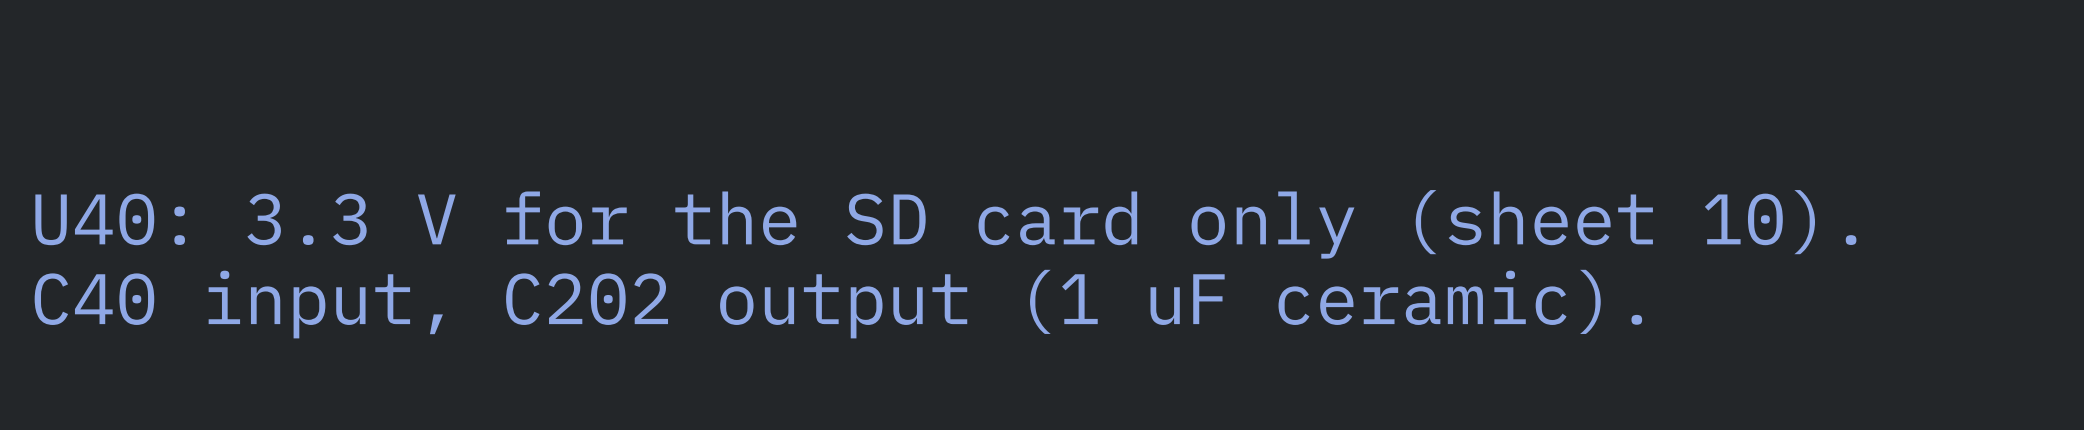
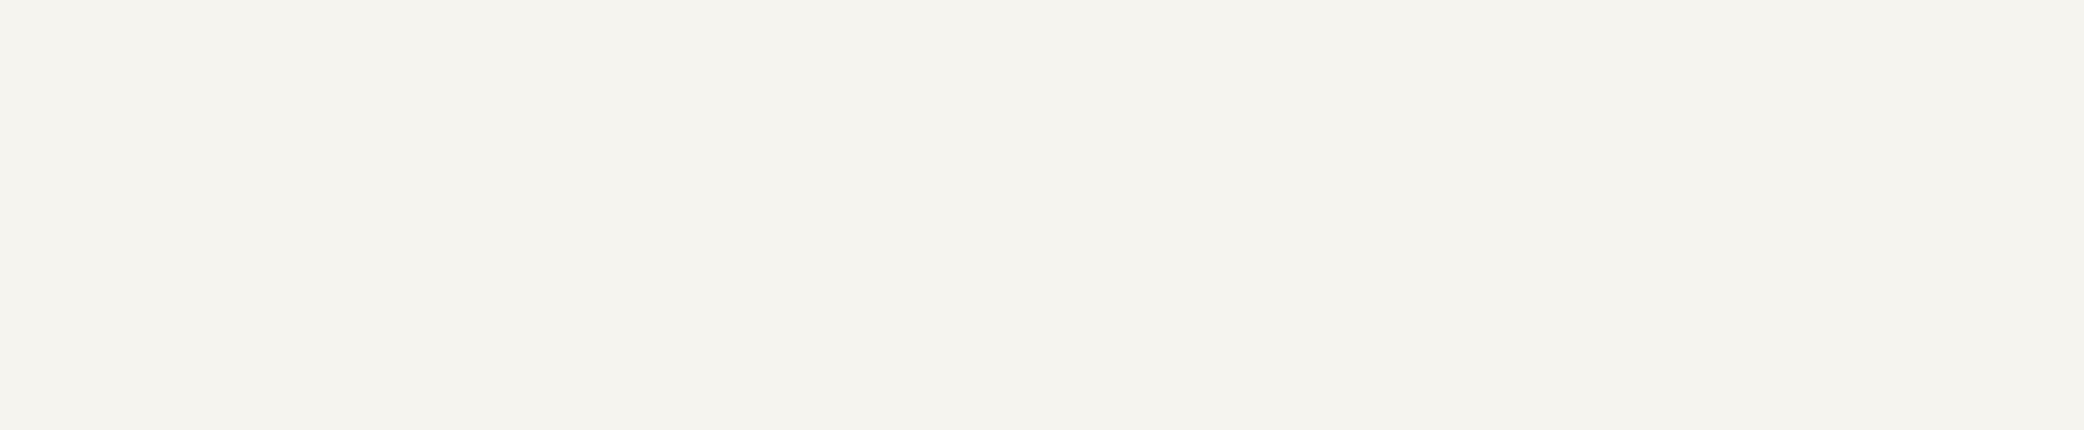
text: U40: 3.3 V for the SD card only (sheet 10). (945, 224) -> none
text: C40 input, C202 output (1 uF ceramic). (838, 304) -> none

